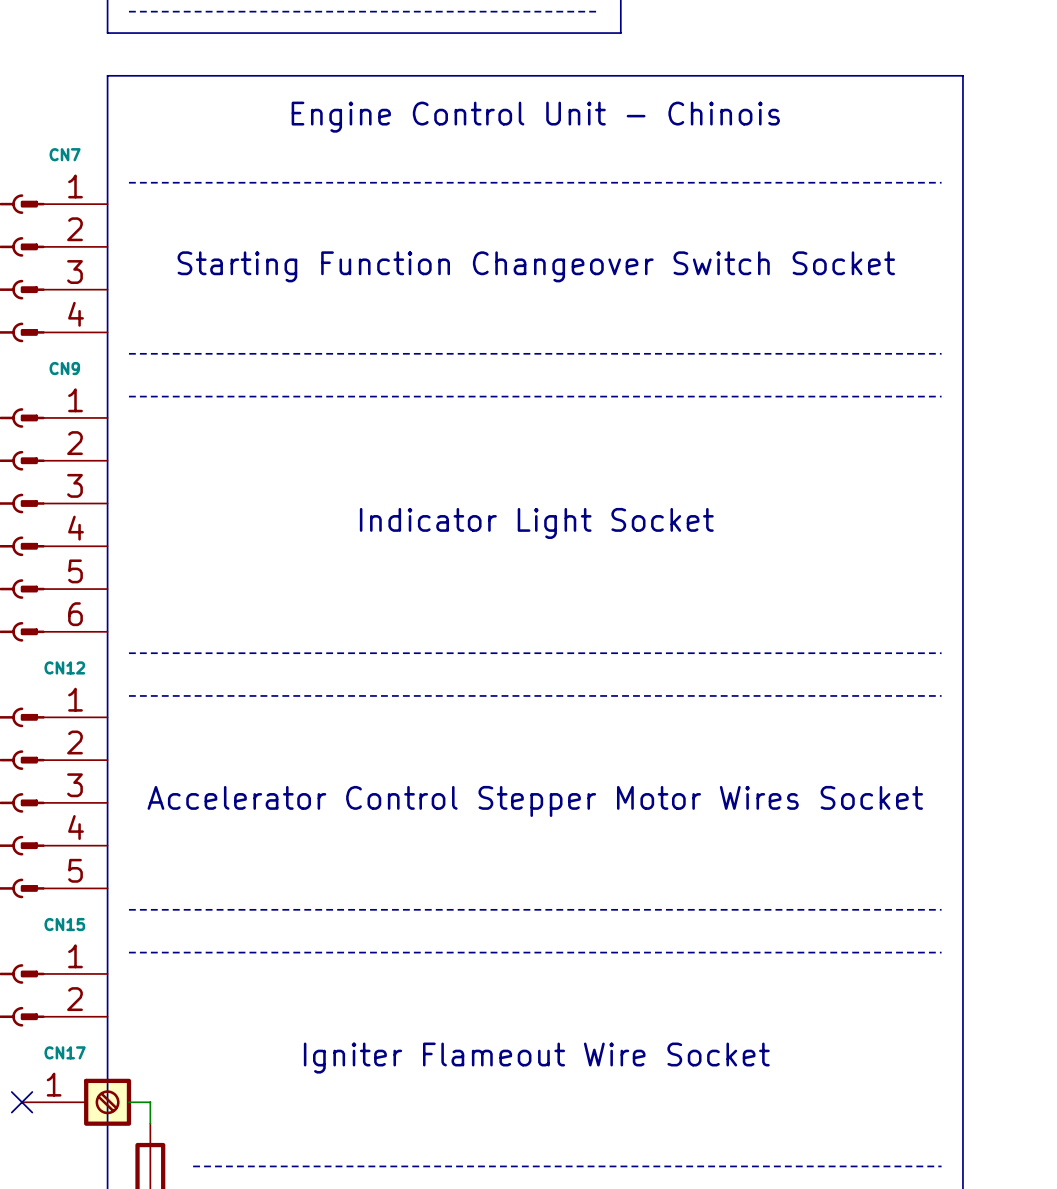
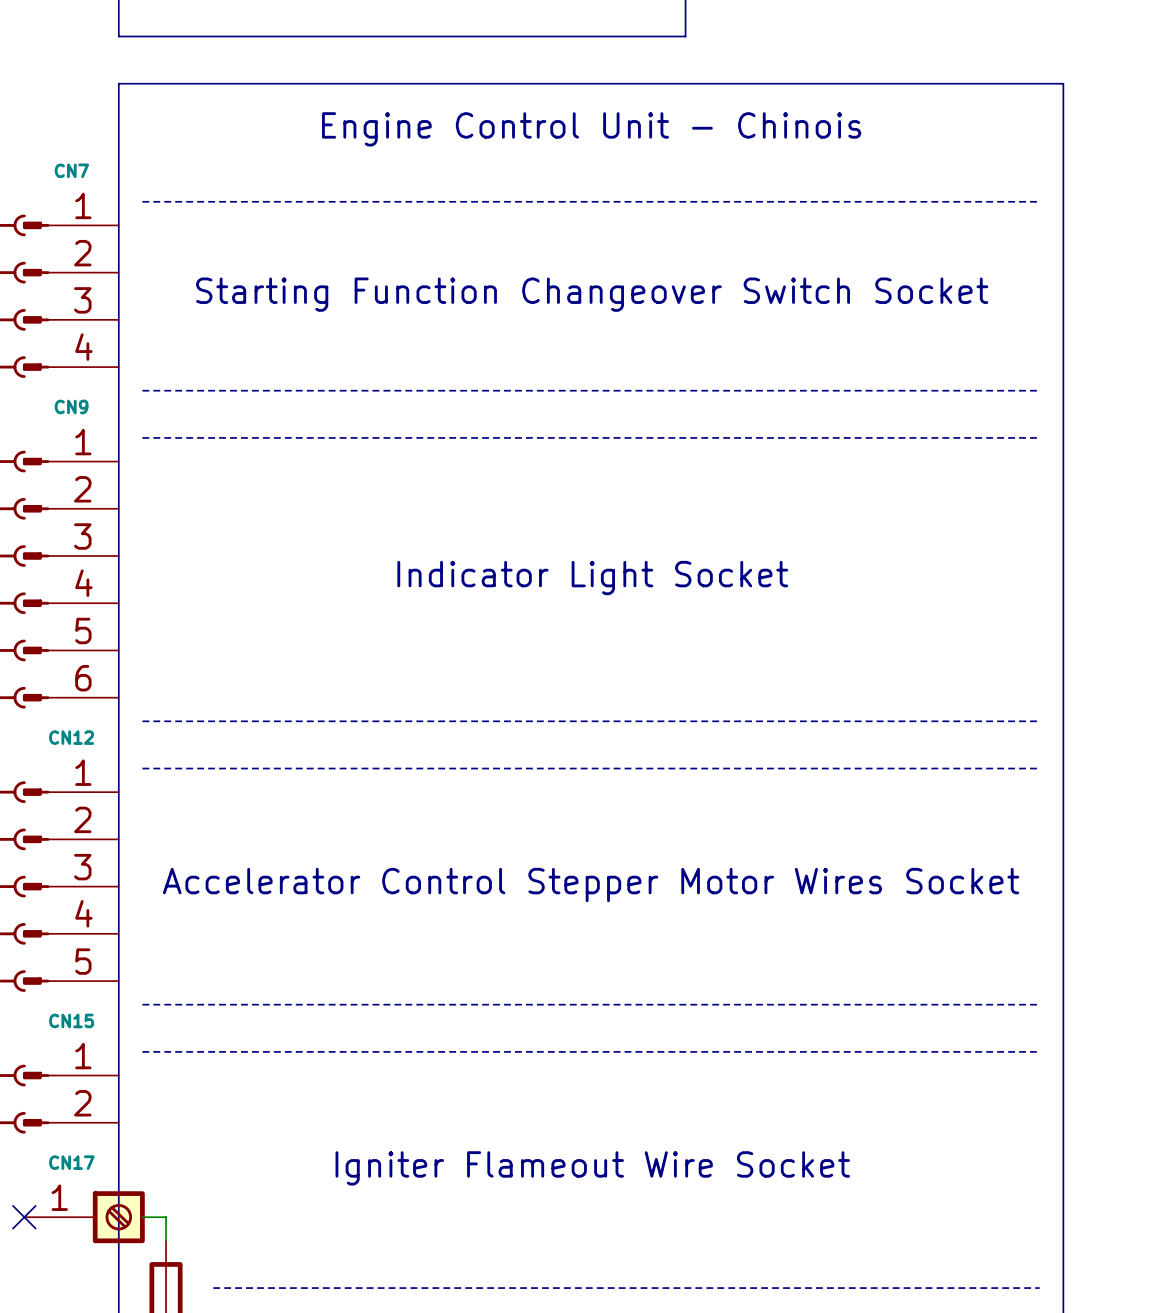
line: (128, 11) (599, 11) -> none

